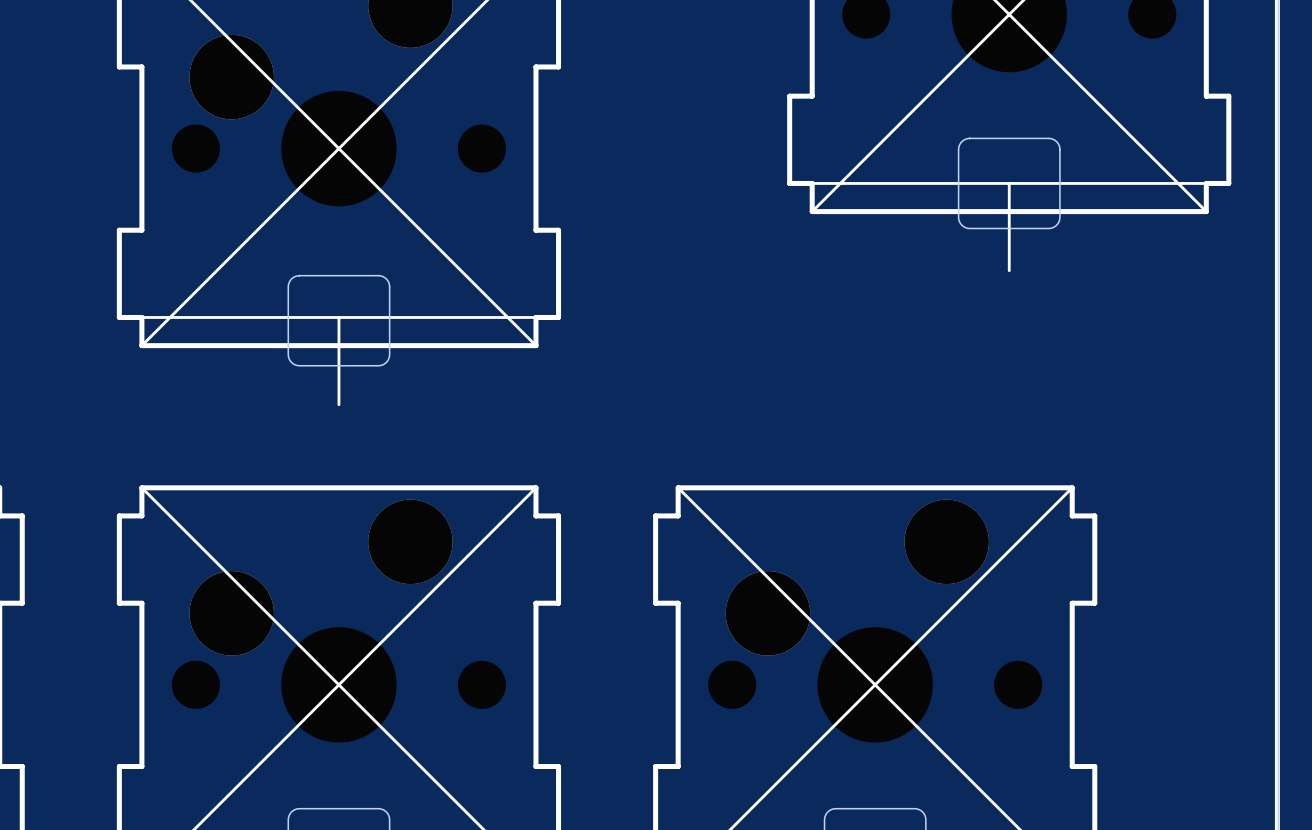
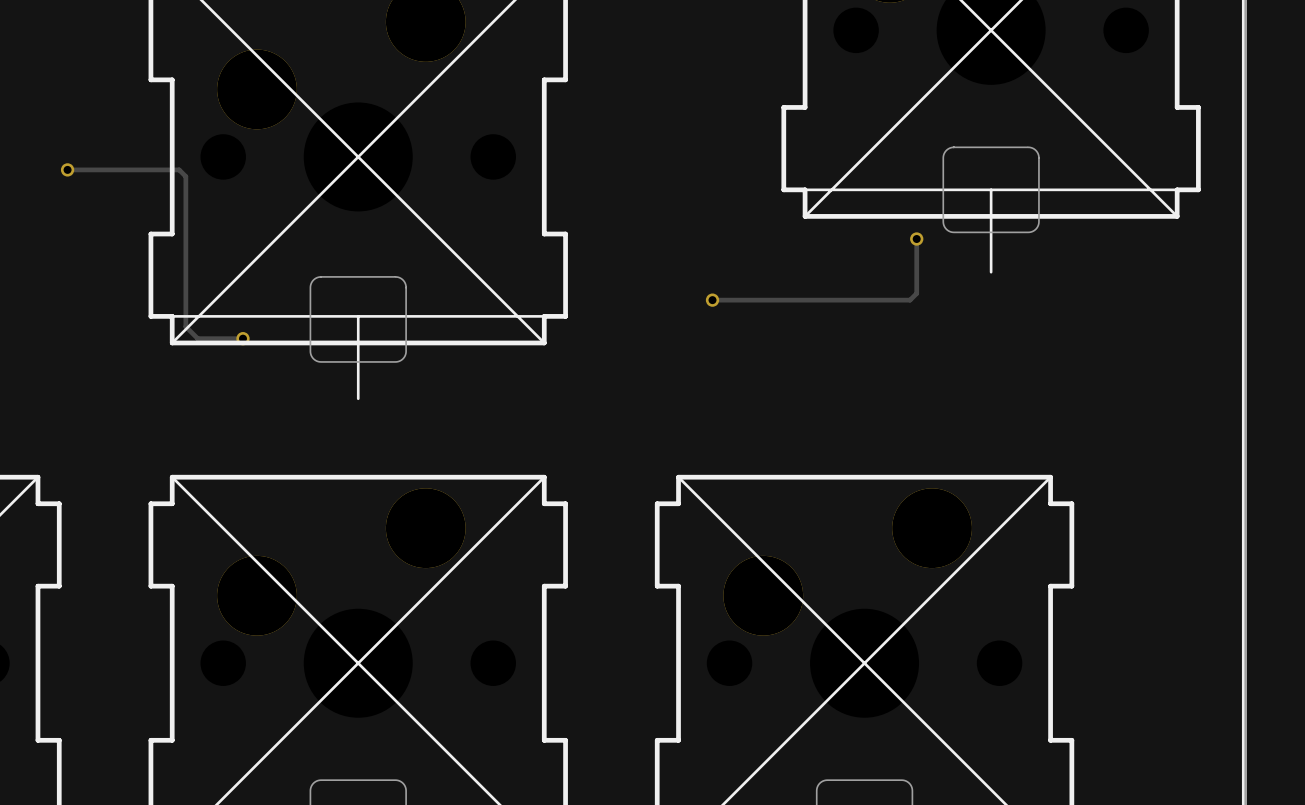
track: none -> (67, 169) (179, 169) (185, 176) (185, 326) (197, 338) (242, 338)
via: none -> (67, 169)
track: none -> (916, 239) (916, 293) (910, 300) (712, 300)
via: none -> (916, 239)
via: none -> (712, 300)
via: none -> (242, 338)

